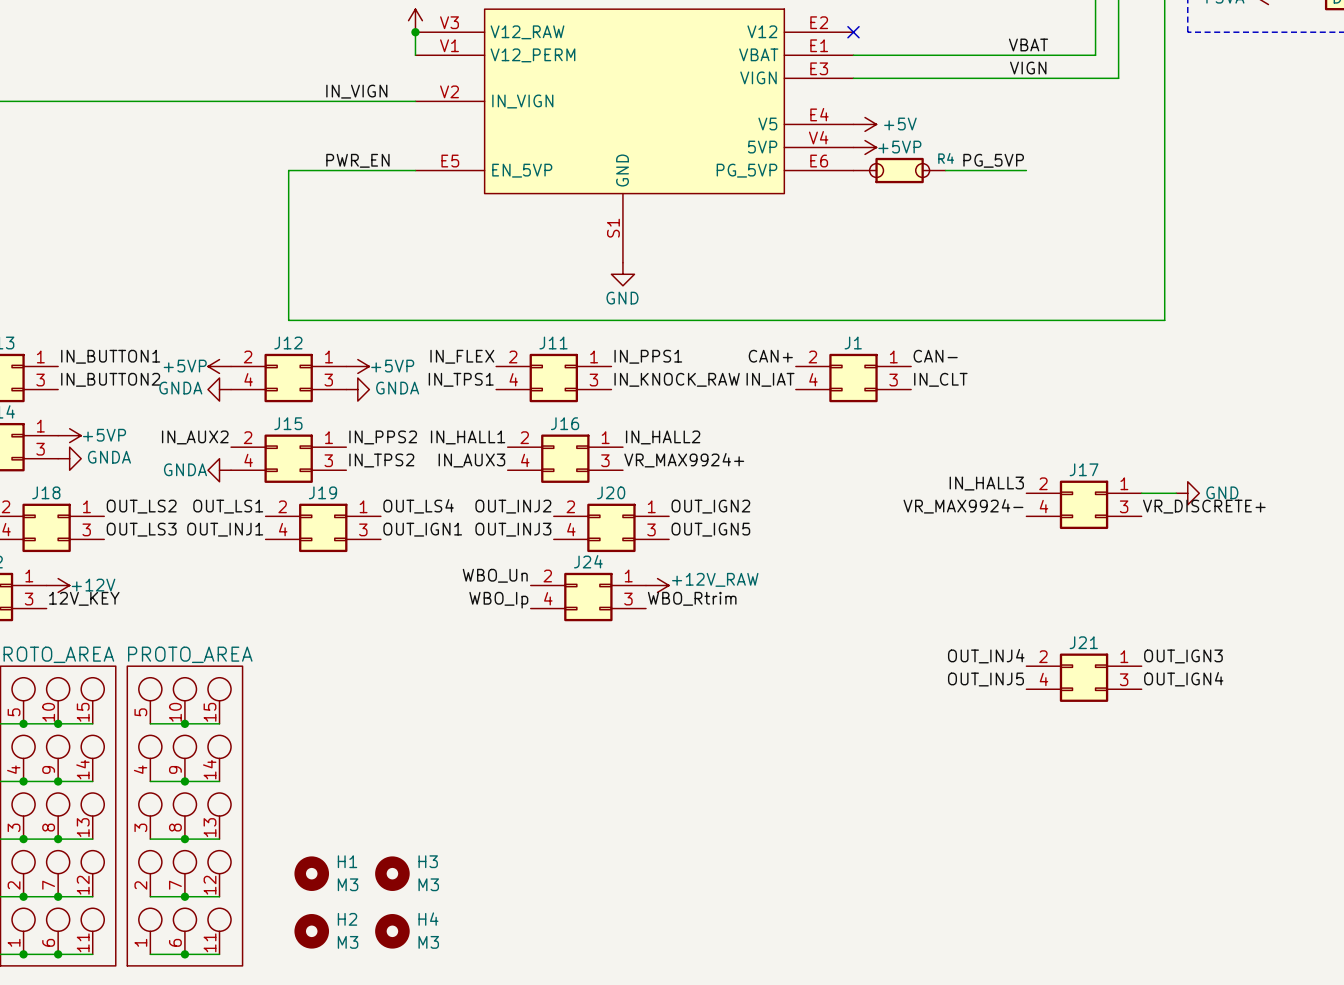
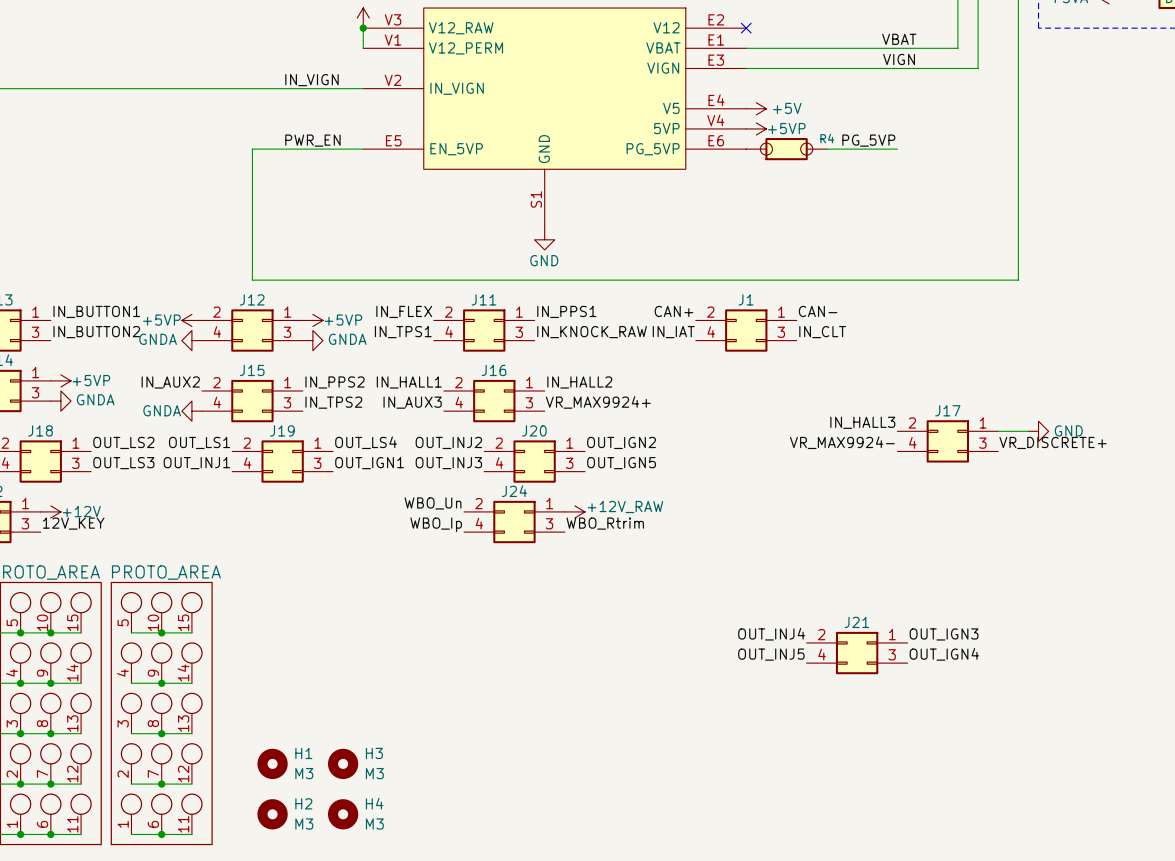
label position: OUT_INJ4 (986, 656) -> OUT_INJ4 (771, 634)
label position: OUT_IGN3 (1183, 656) -> OUT_IGN3 (944, 634)
J21 position: (1084, 677) -> (857, 653)
label position: OUT_INJ5 (985, 679) -> OUT_INJ5 (771, 654)
label position: OUT_IGN4 (1183, 679) -> OUT_IGN4 (944, 654)

